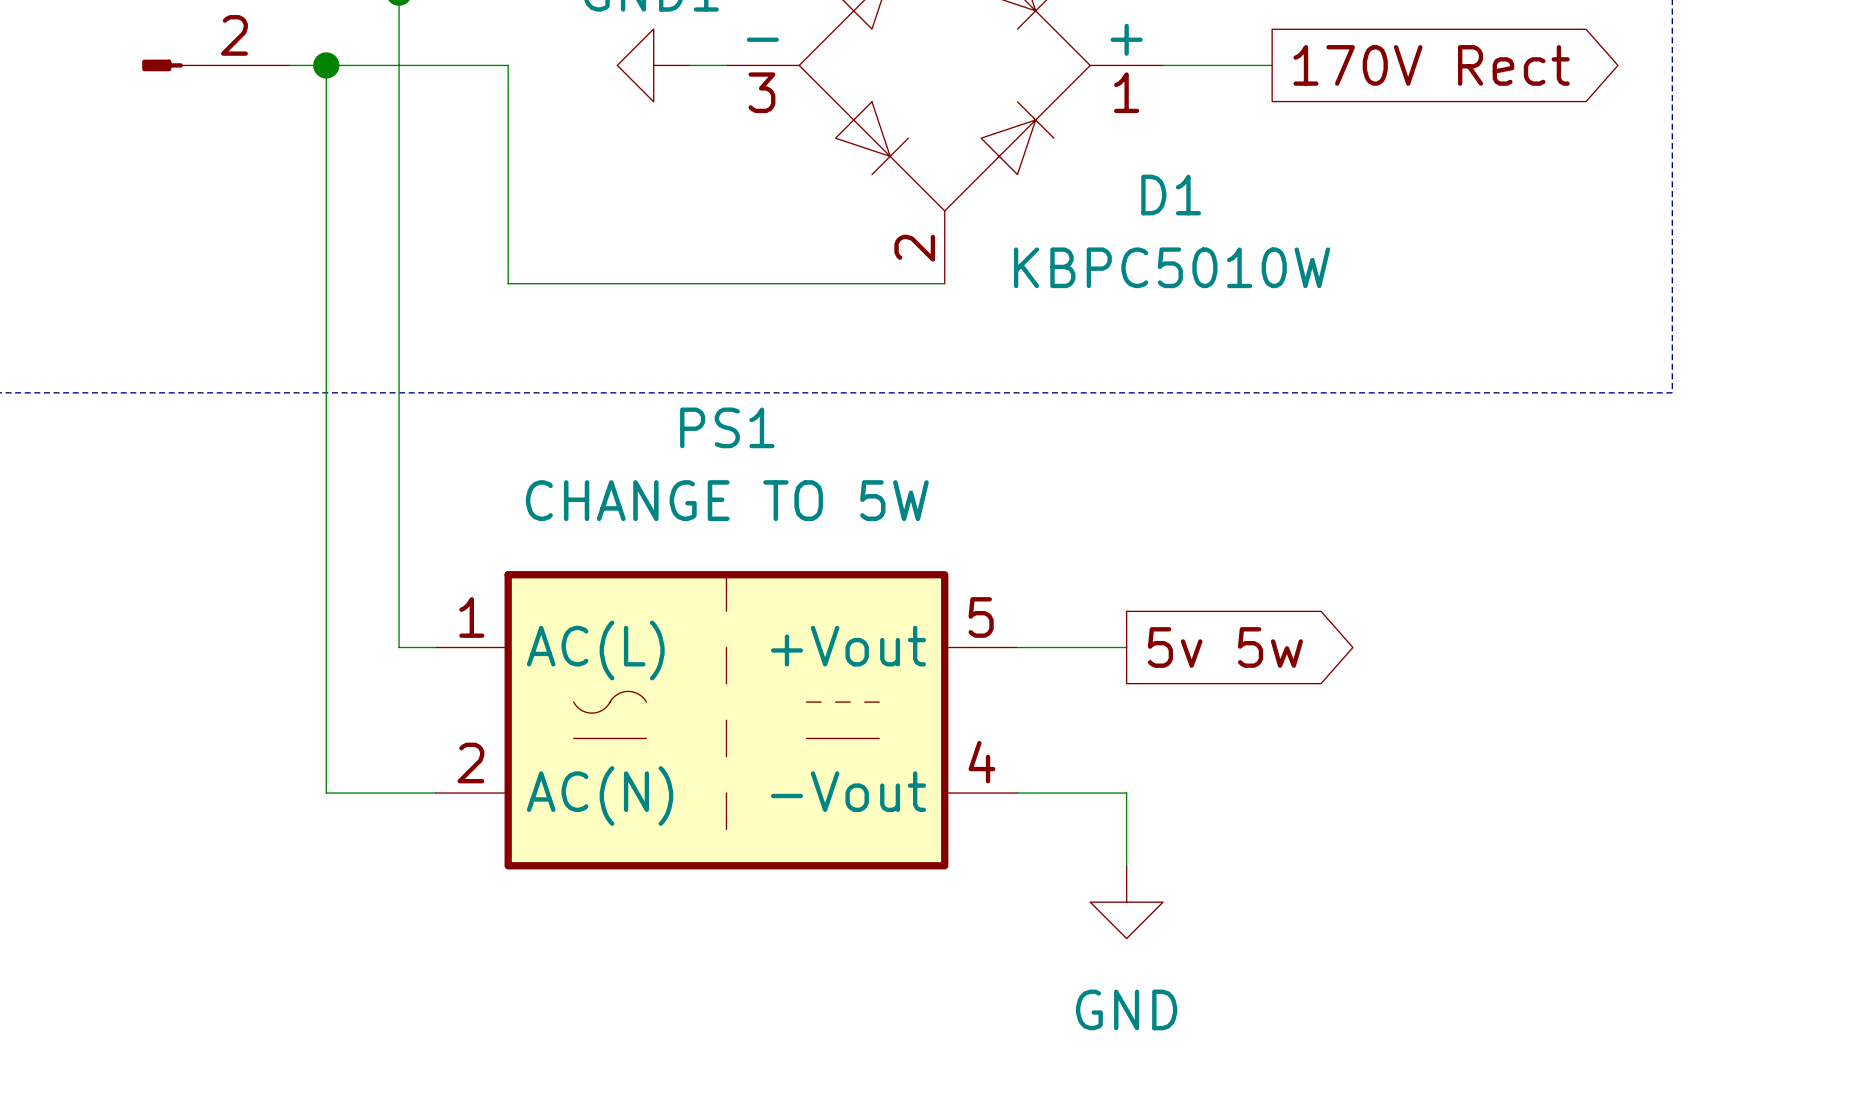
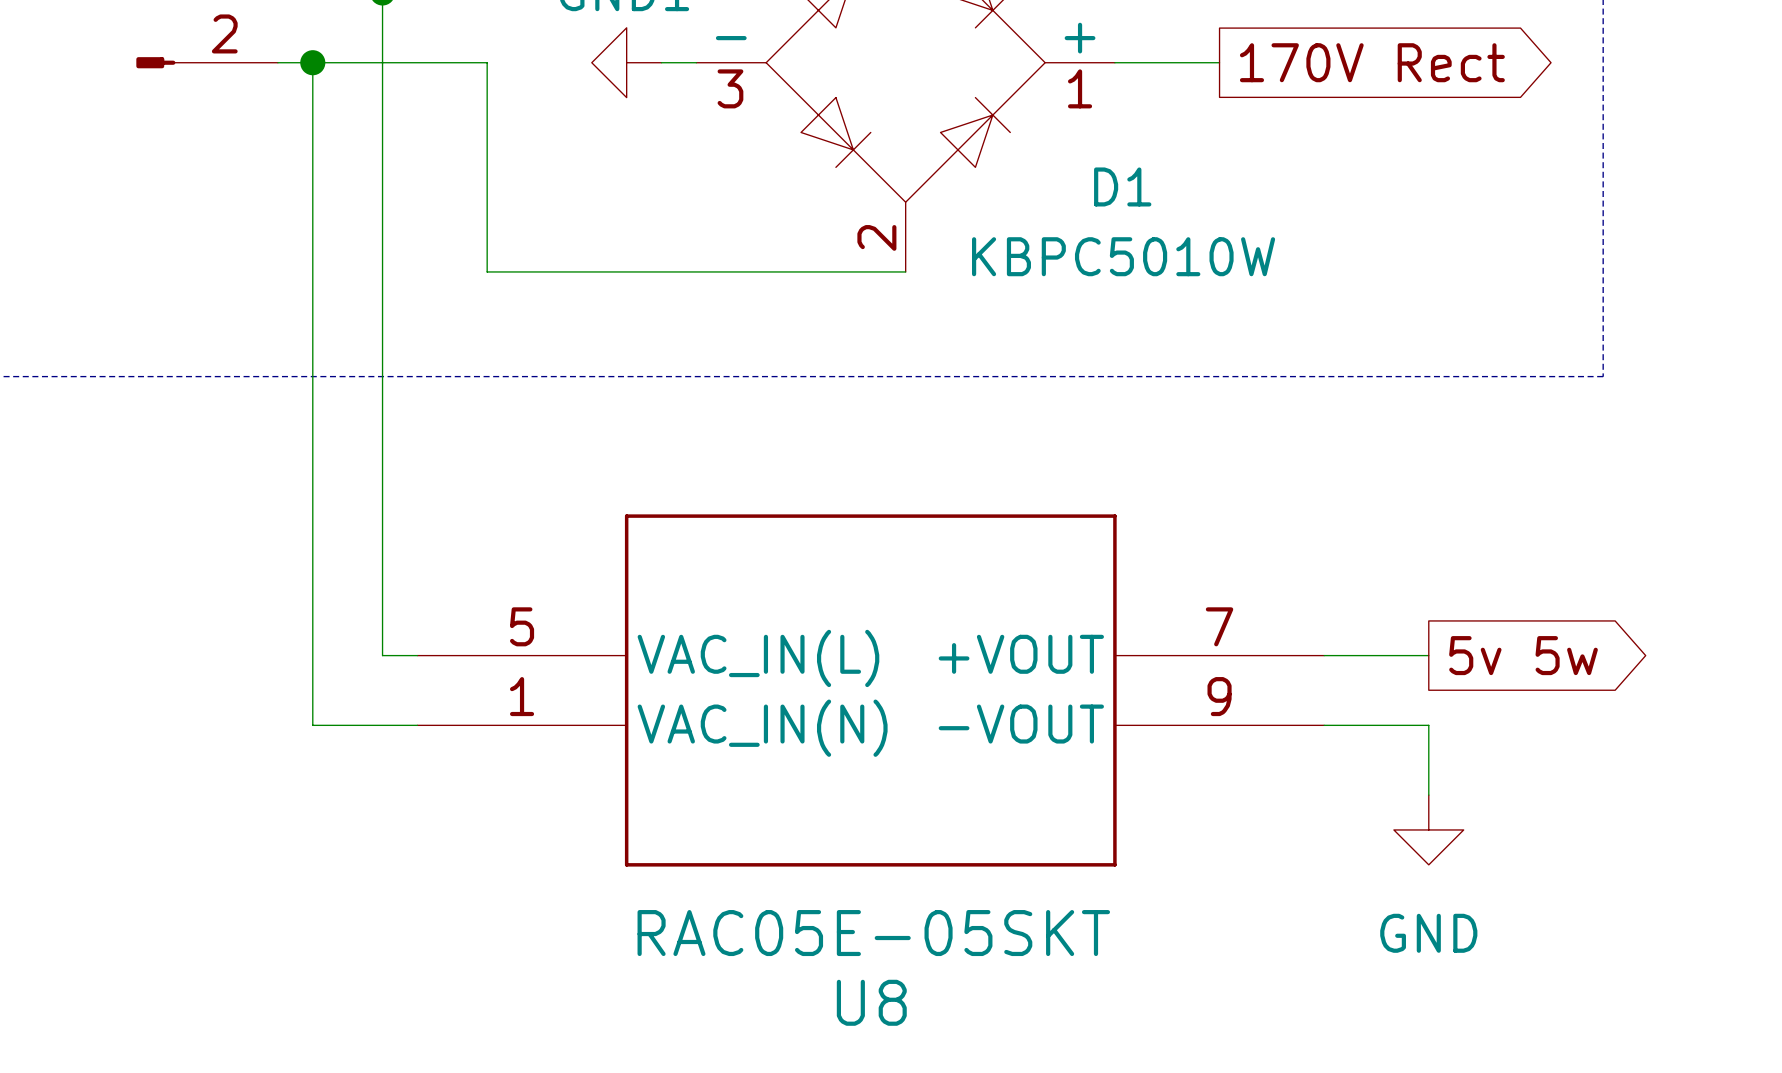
wire: (399, 647) (435, 647) -> (382, 620) (382, 655) (417, 655)
wire: (1017, 647) (1126, 647) -> (1324, 655) (1428, 655)
global label position: 5v 5w (1225, 647) -> 5v 5w (1523, 655)
PS1: CHANGE TO 5W (726, 720) -> none
U8: none -> RAC05E-05SKT (870, 690)
wire: (326, 756) (326, 793) (435, 793) -> (312, 725) (417, 725)
wire: (1017, 793) (1126, 793) (1126, 865) -> (1324, 725) (1428, 725) (1428, 795)
power symbol position: GND (1126, 902) -> GND (1428, 829)

